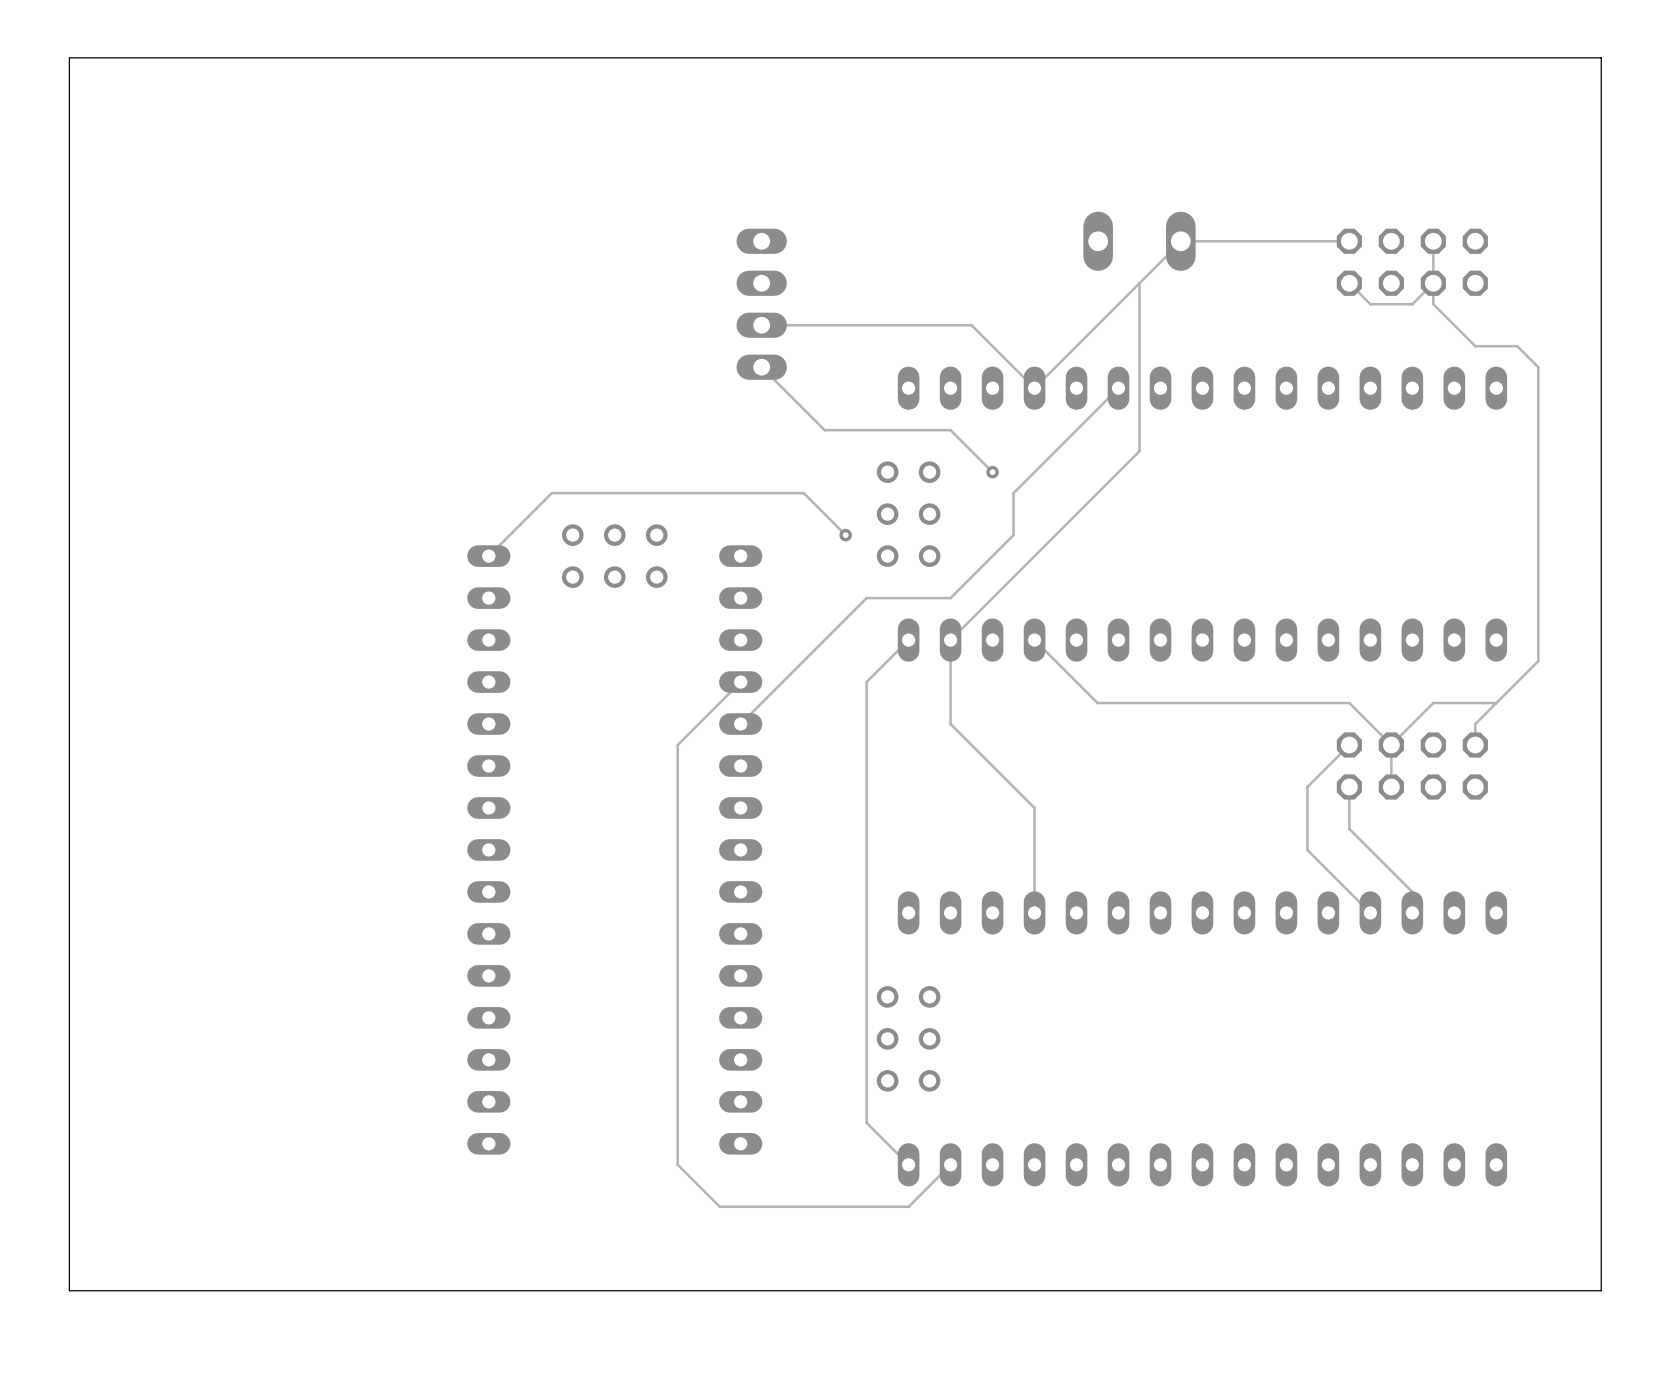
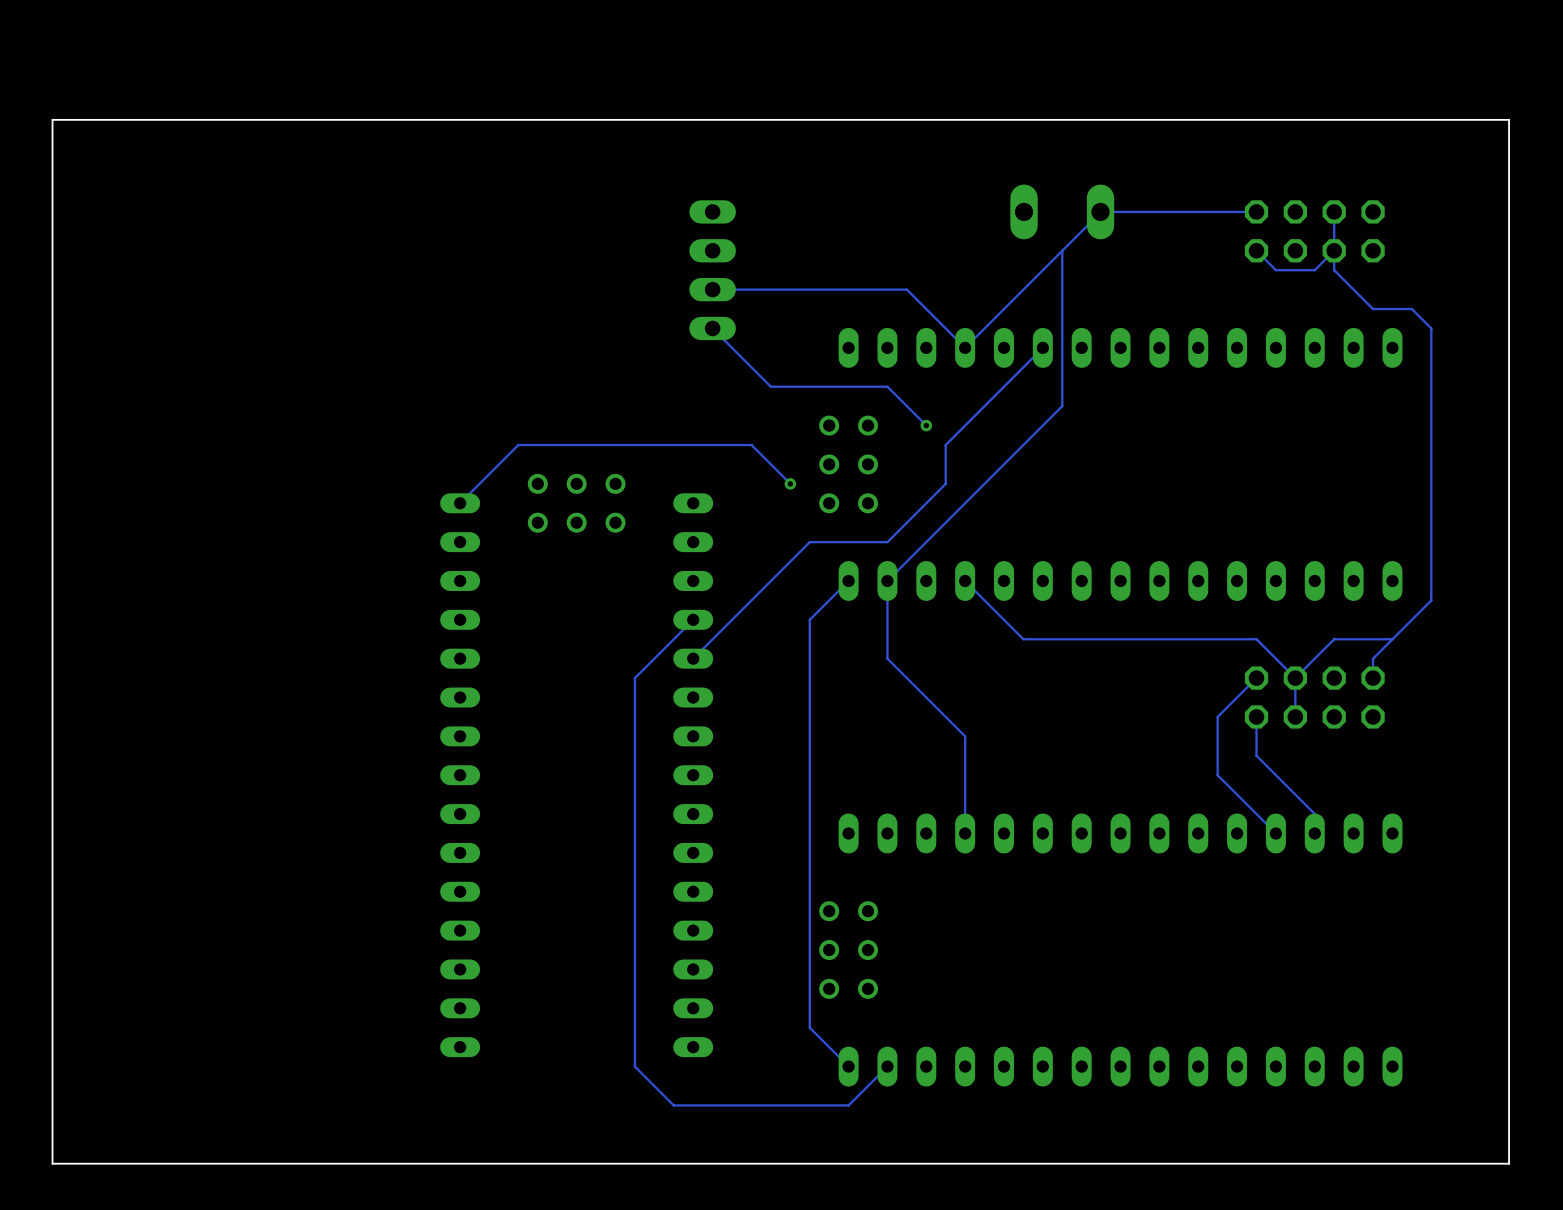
board edge: (1601, 57) (69, 57) (69, 1290) (1601, 1290) (1601, 57) -> (1509, 119) (1509, 1163) (52, 1163) (52, 119) (1509, 119)

